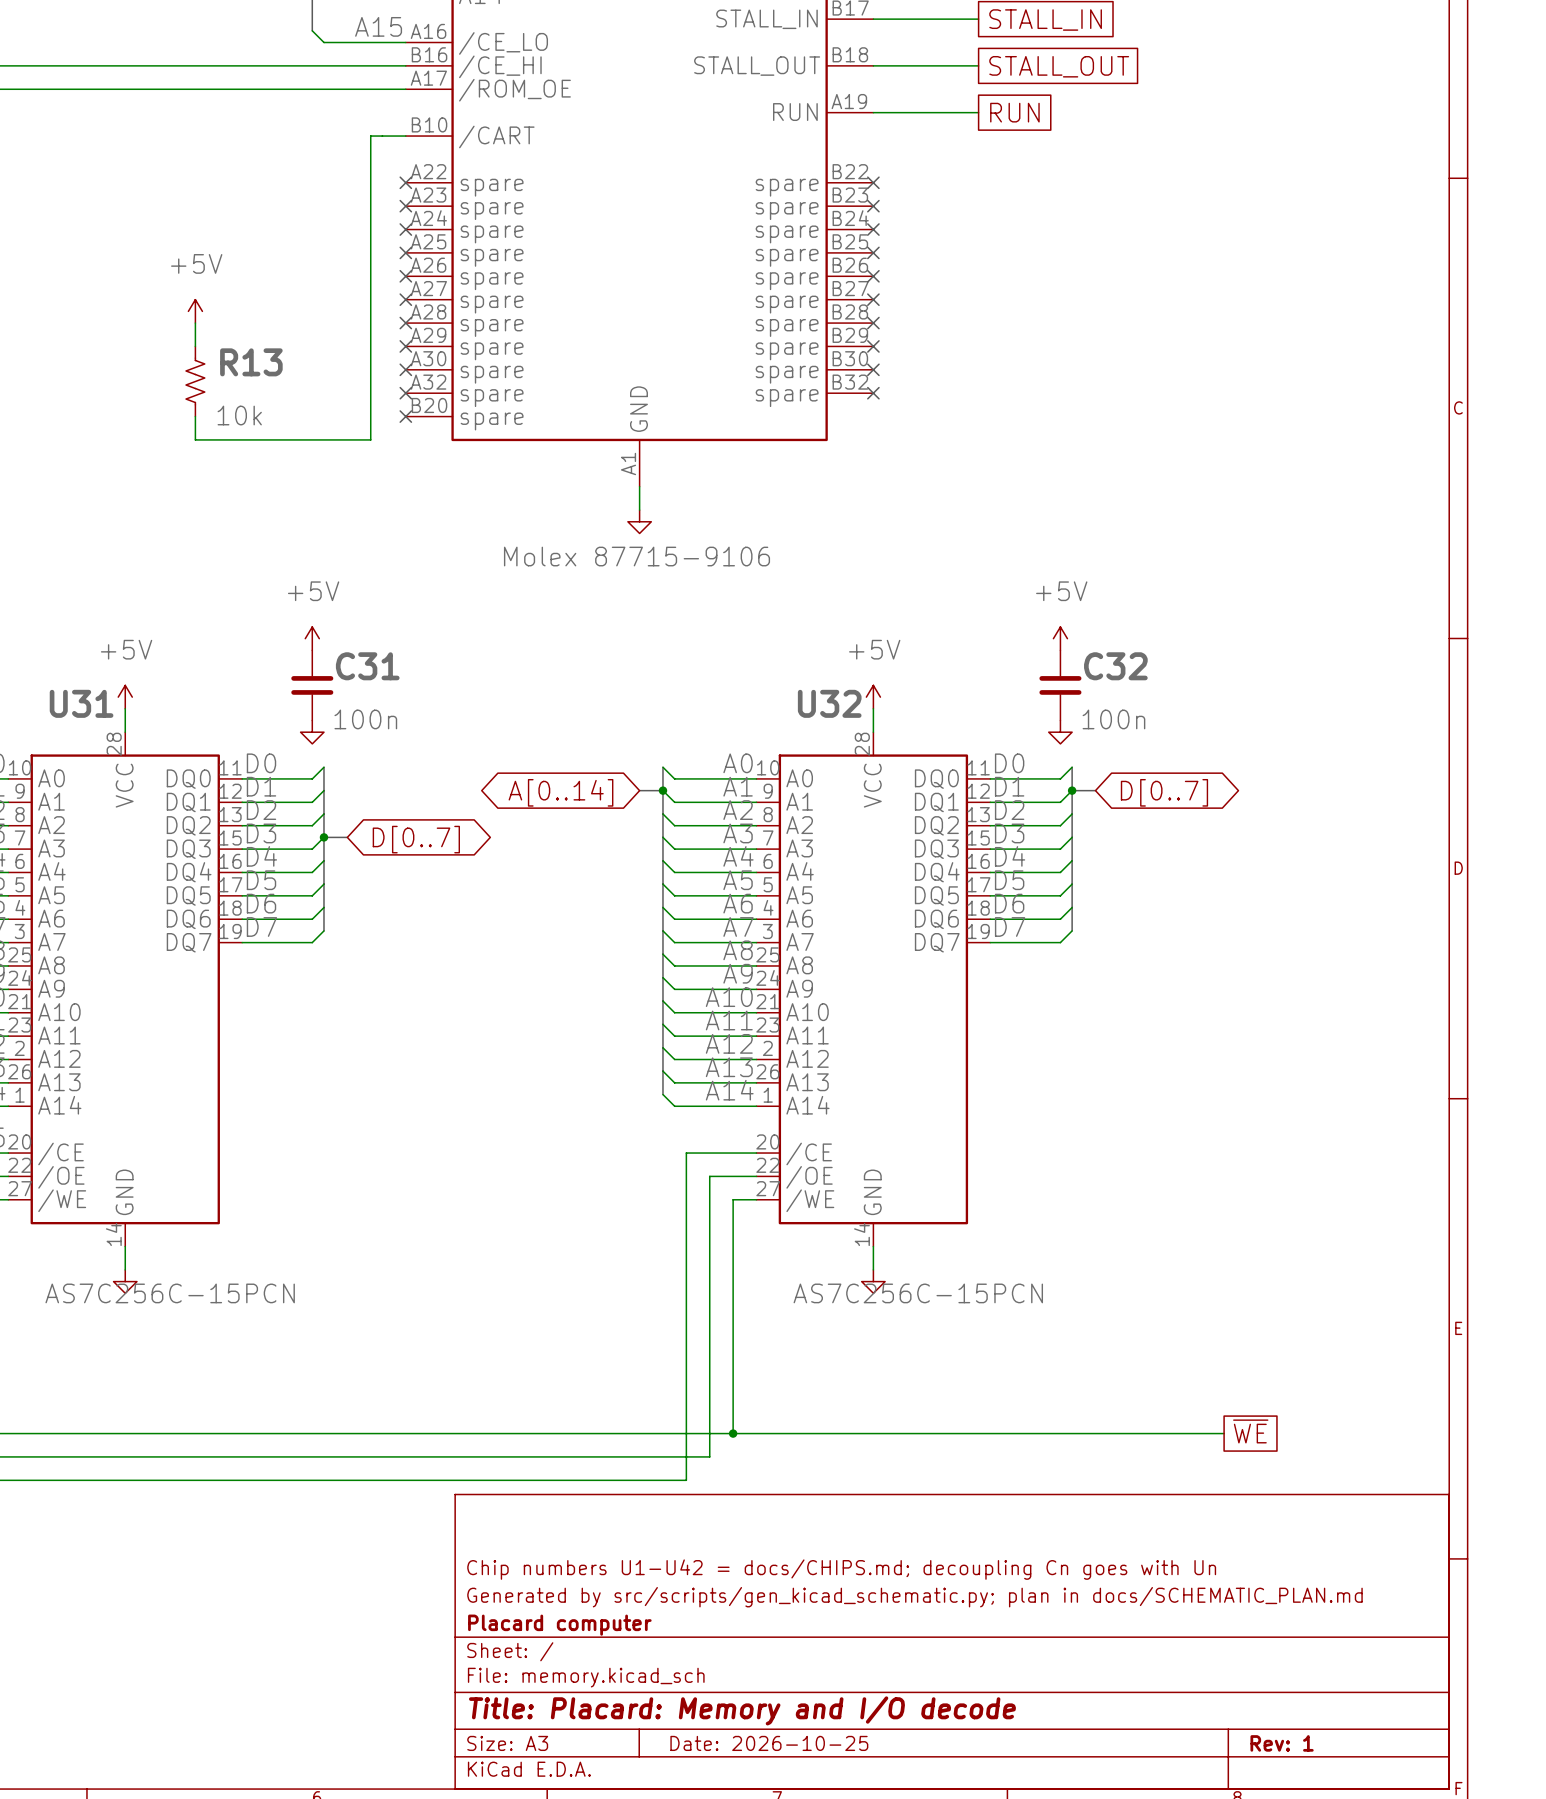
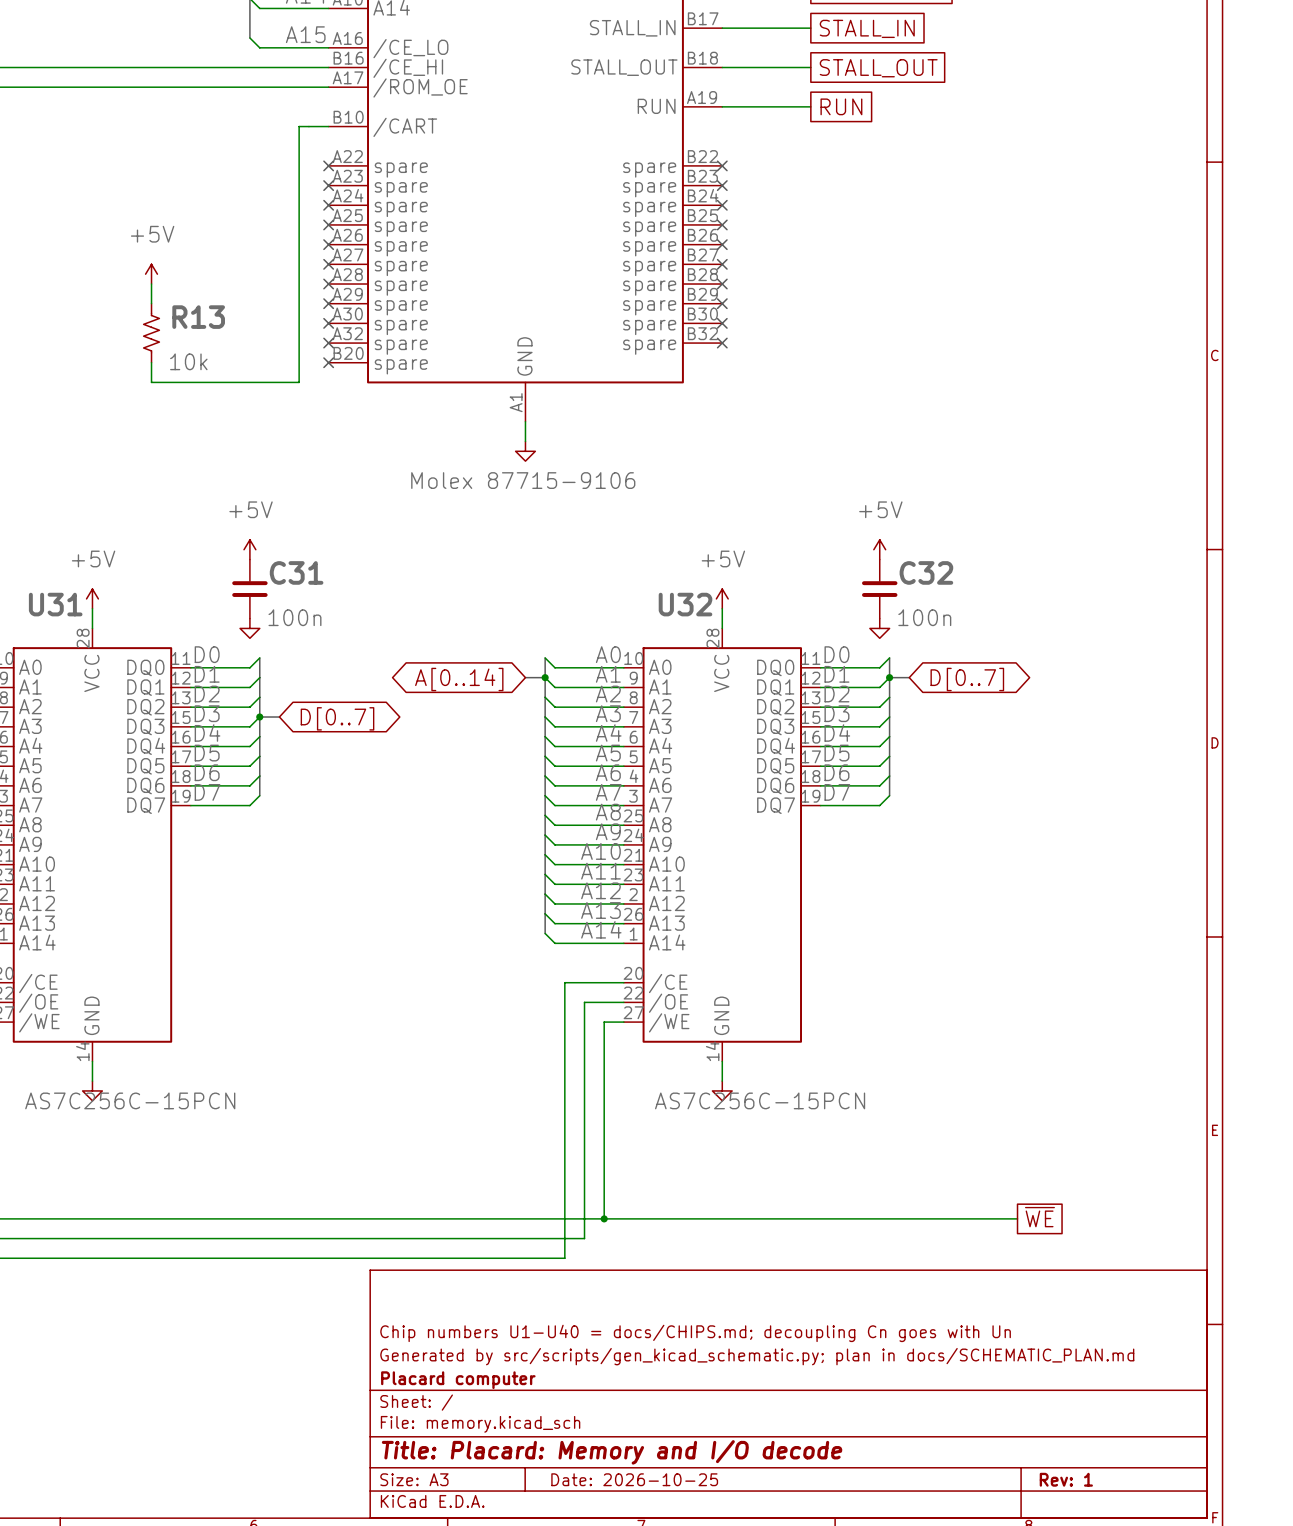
title block: Chip numbers U1-U42 = docs/CHIPS.md; decoupling Cn goes with Un (841, 1569) -> Chip numbers U1-U40 = docs/CHIPS.md; decoupling Cn goes with Un (695, 1333)

